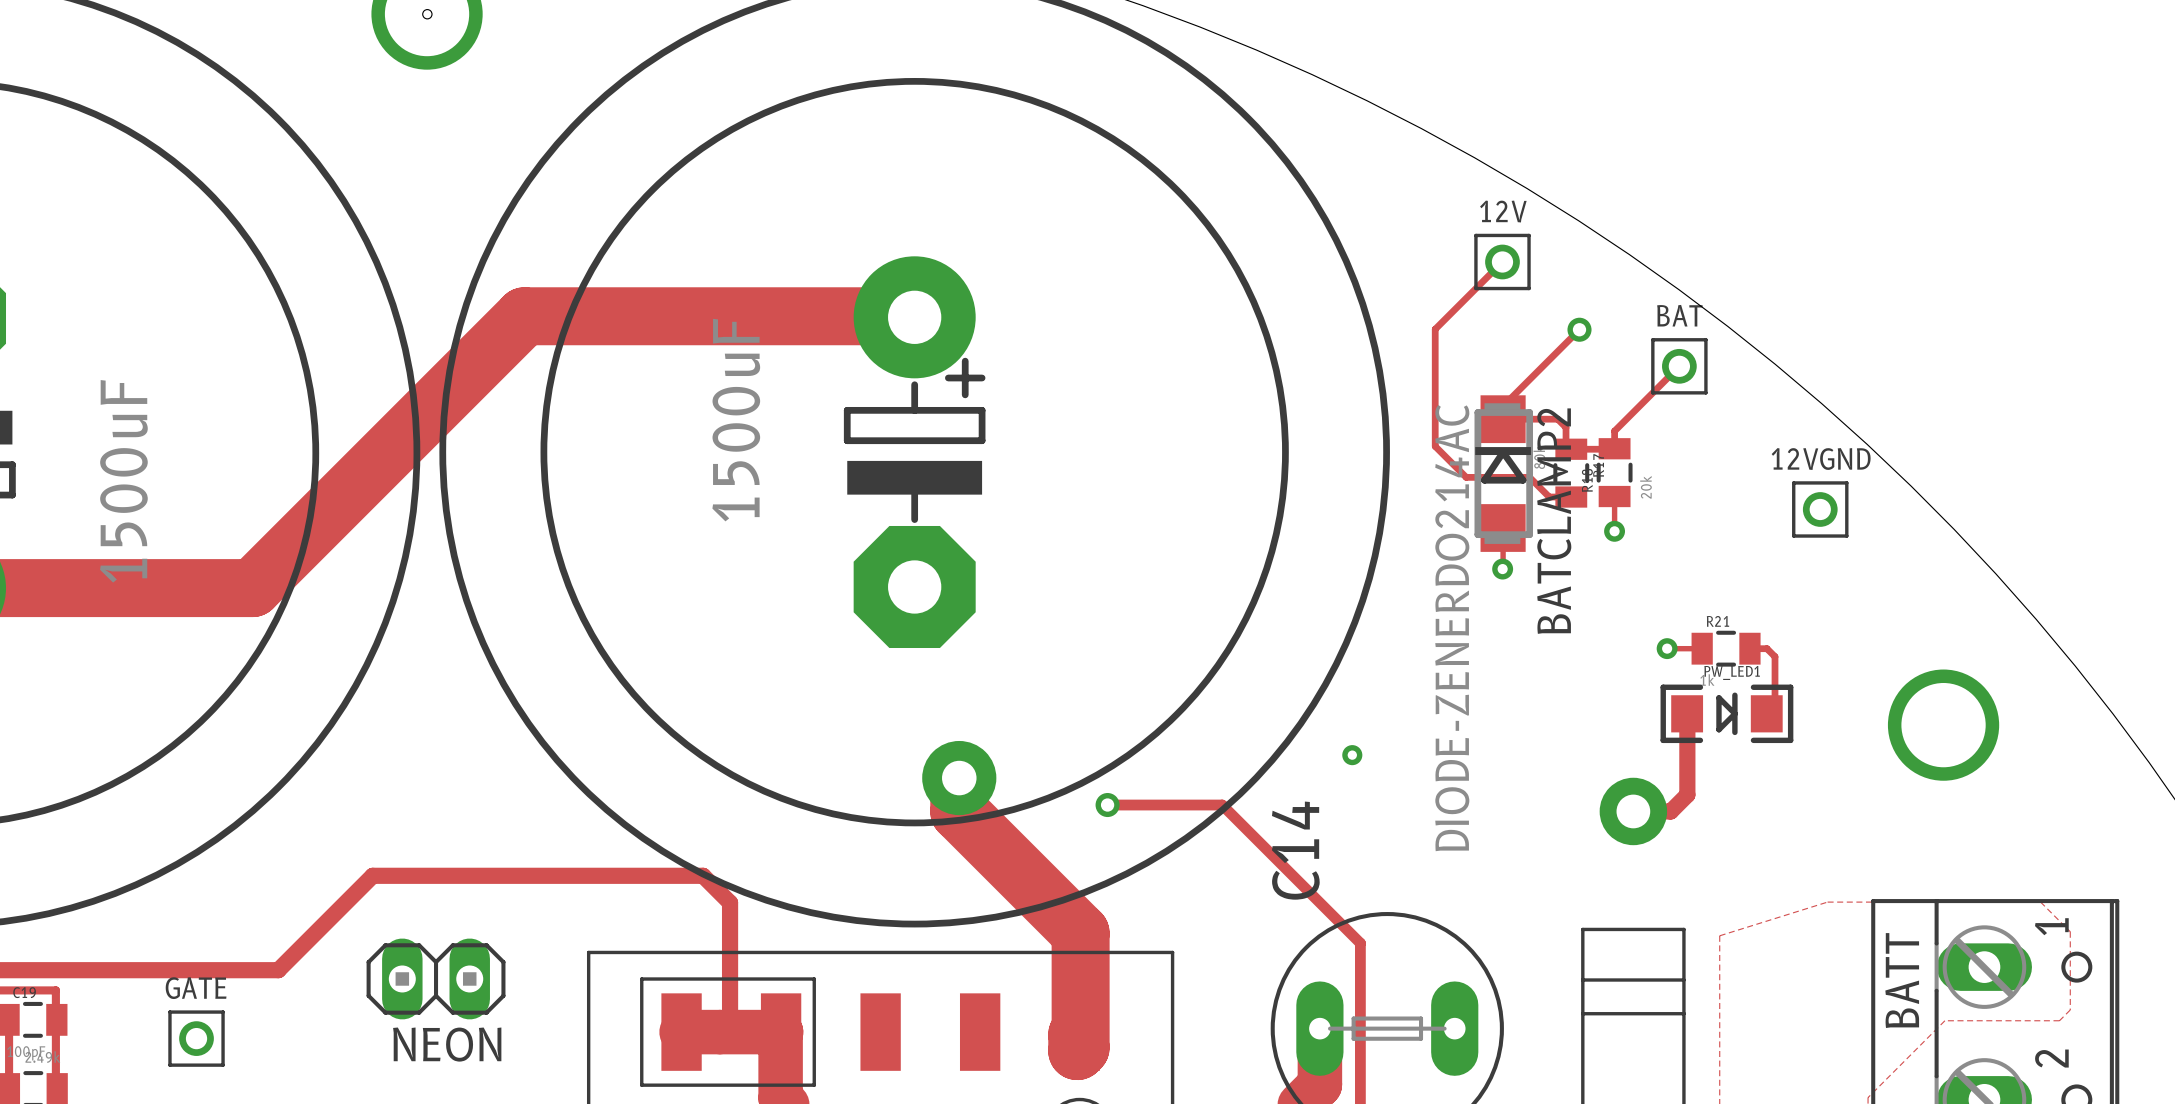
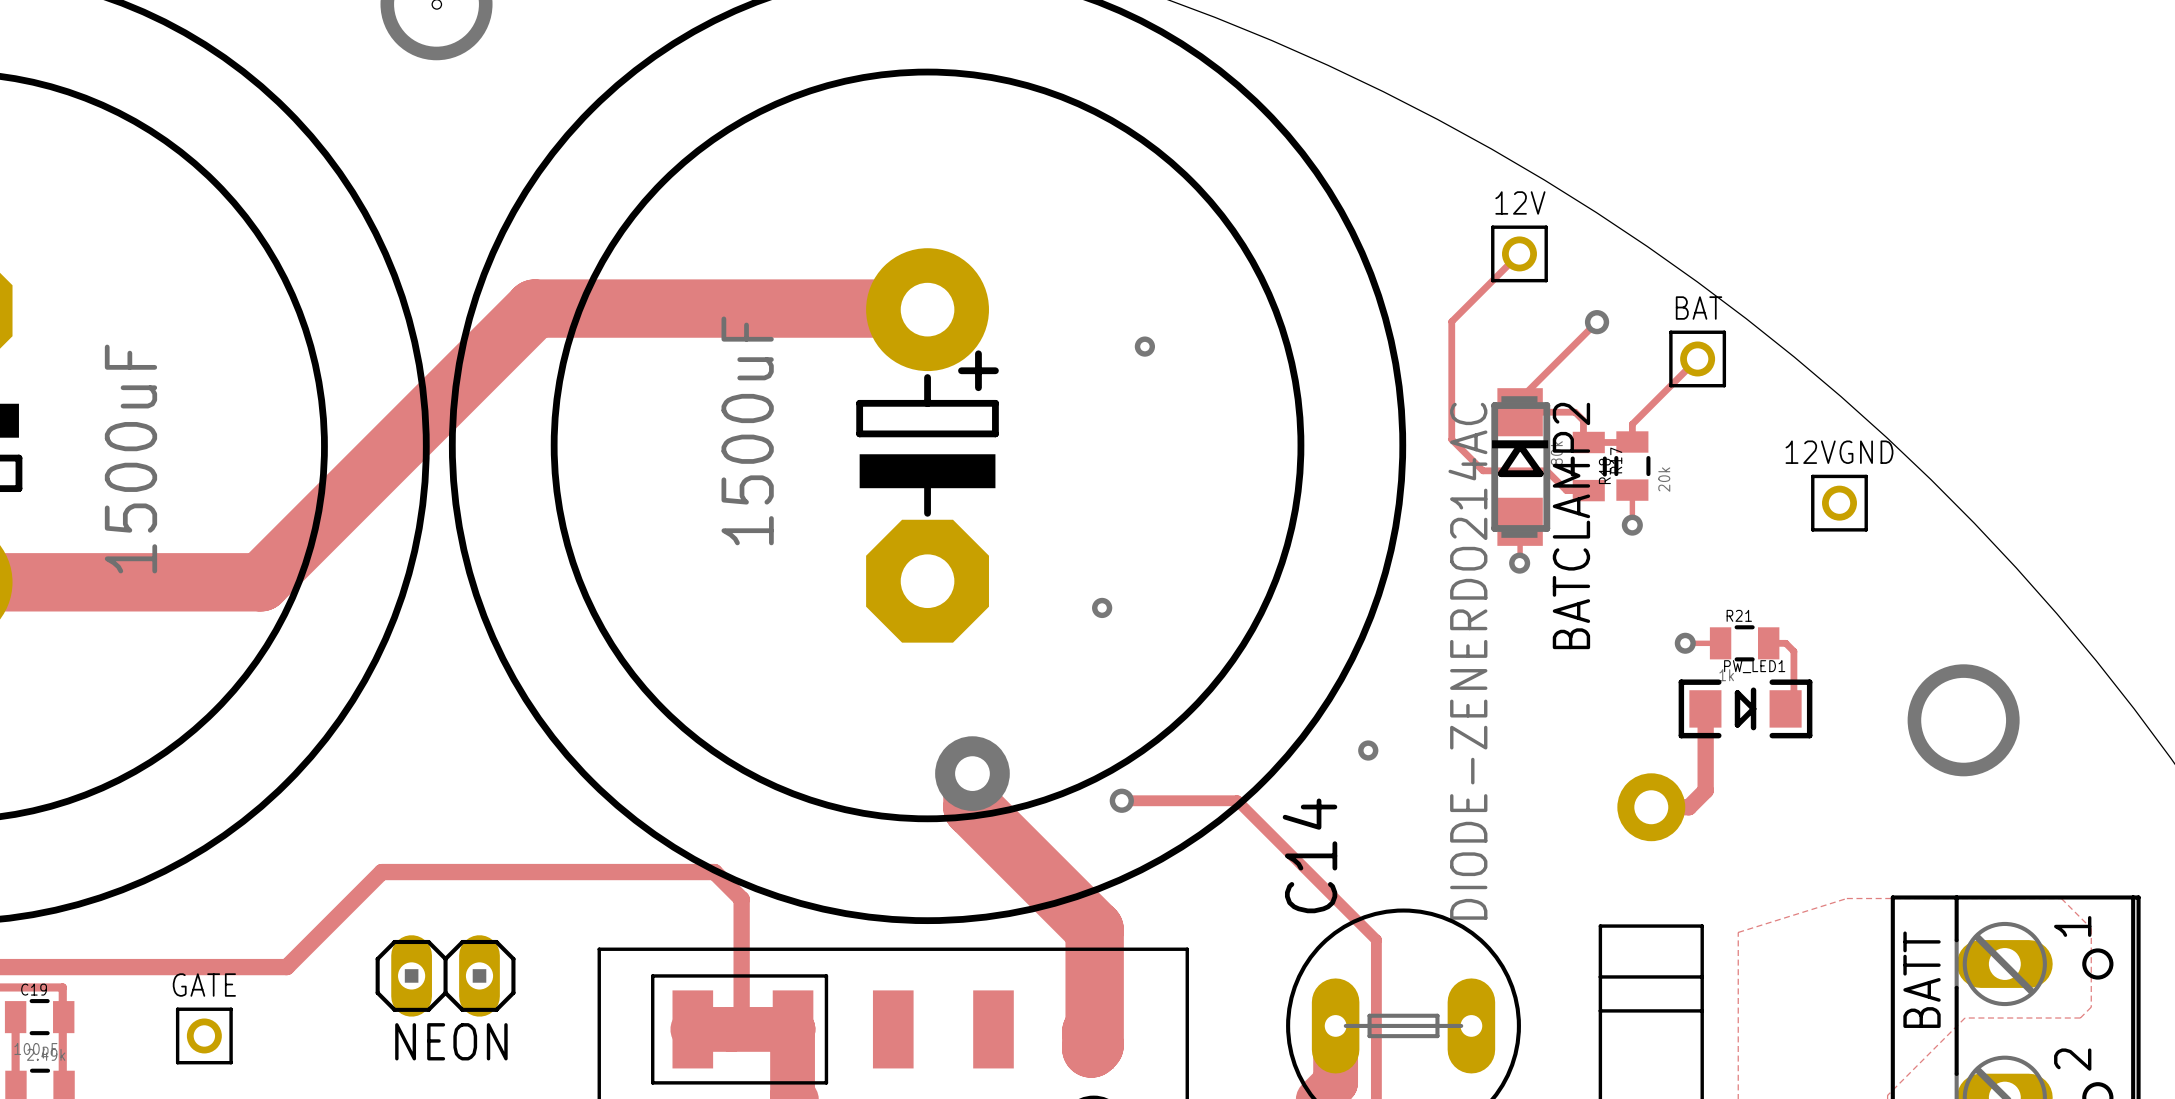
via: none -> (1144, 346)
via: none -> (1102, 607)

